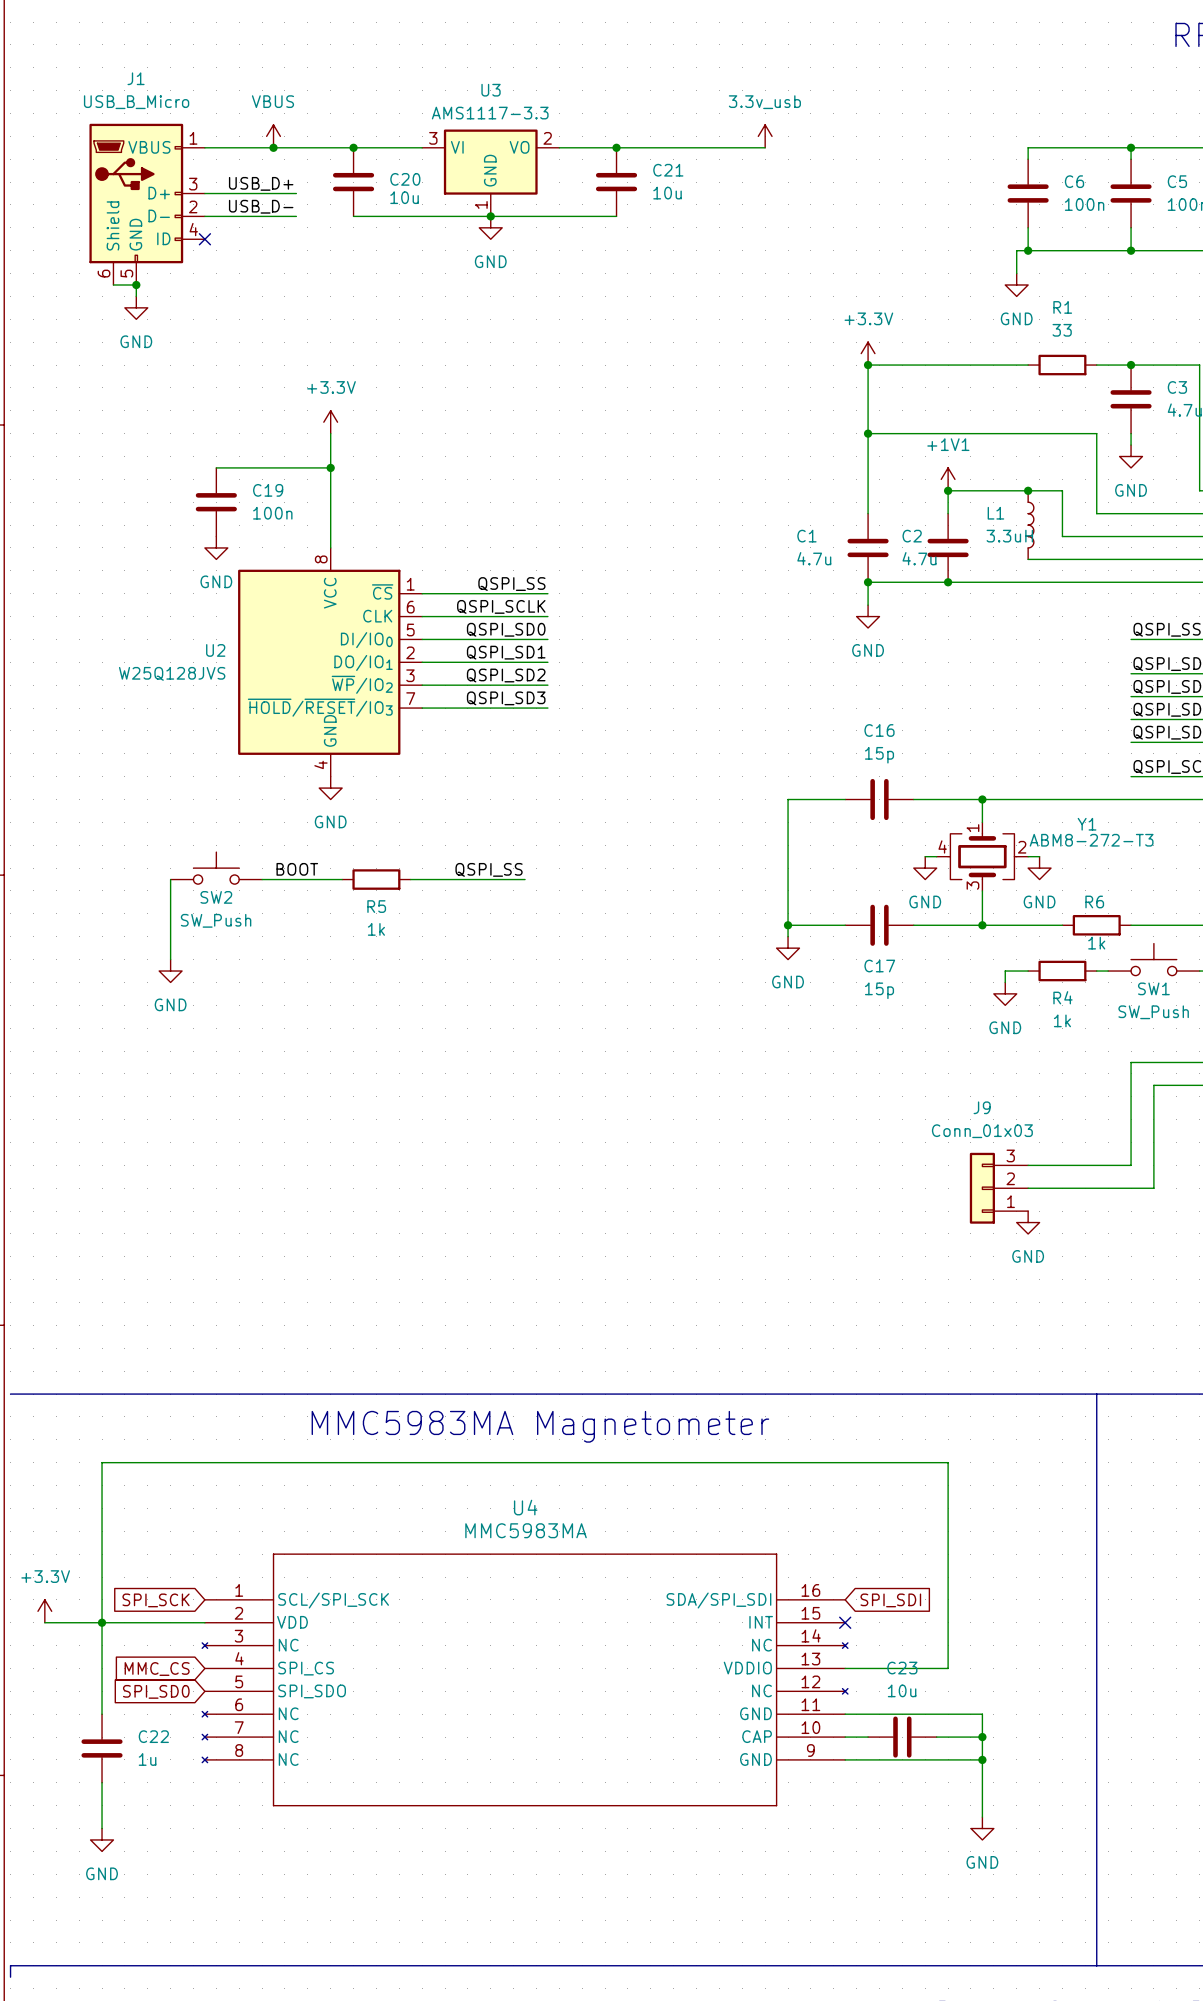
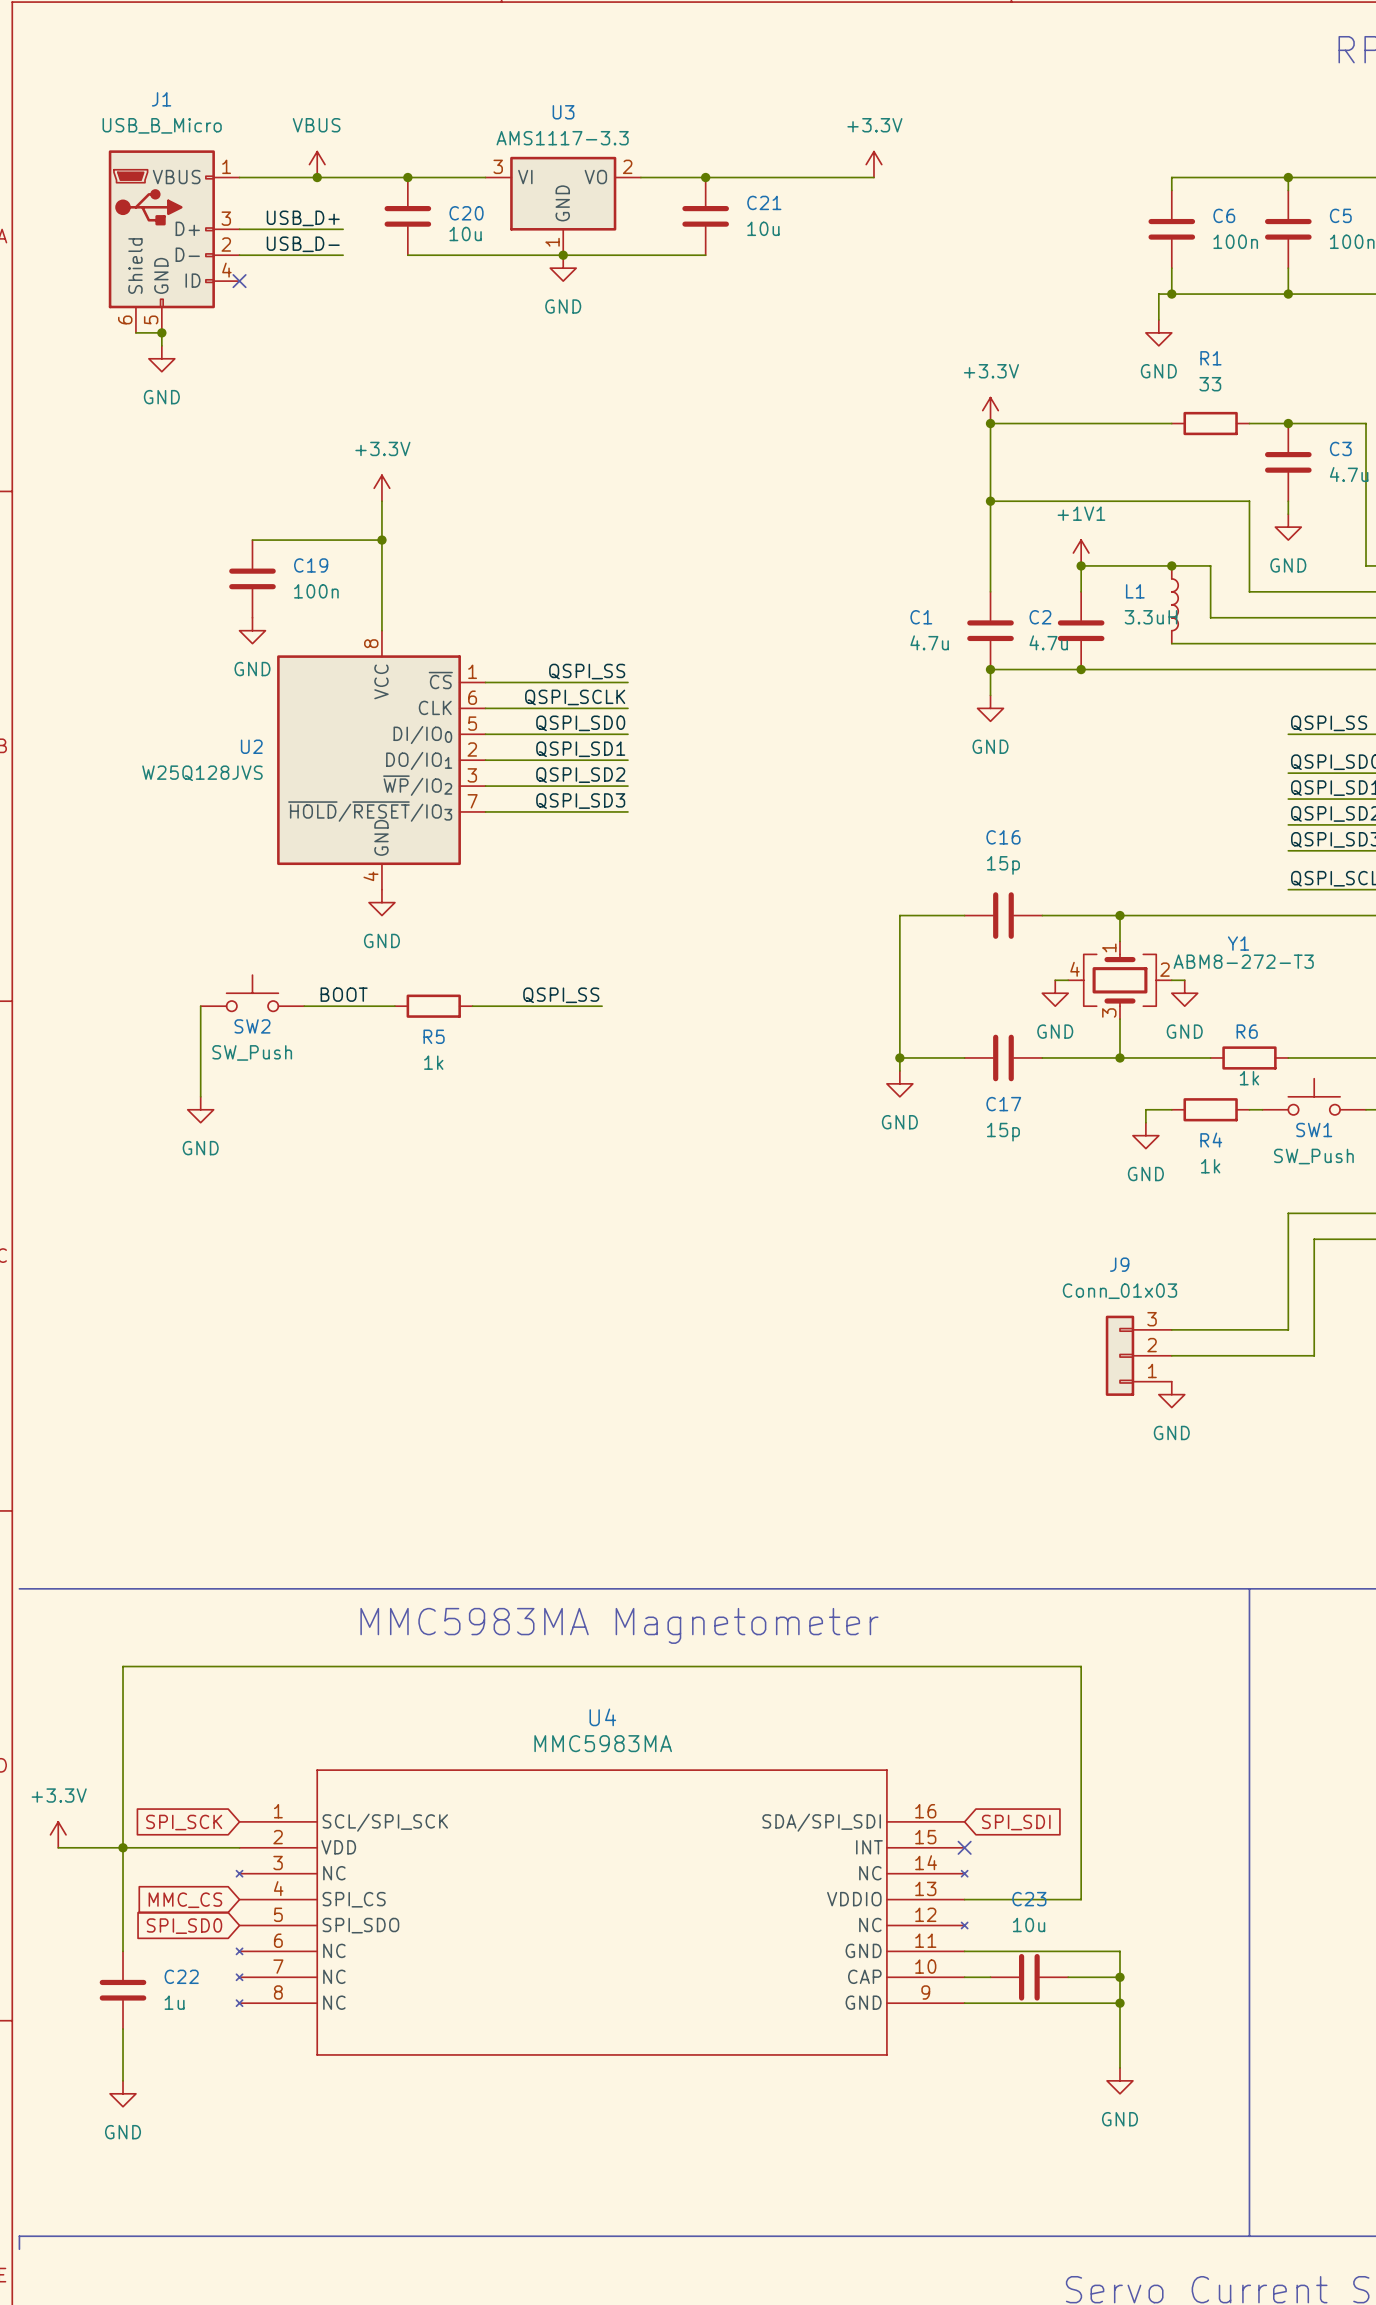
power symbol: 3.3v_usb (765, 136) -> +3.3V (873, 164)

